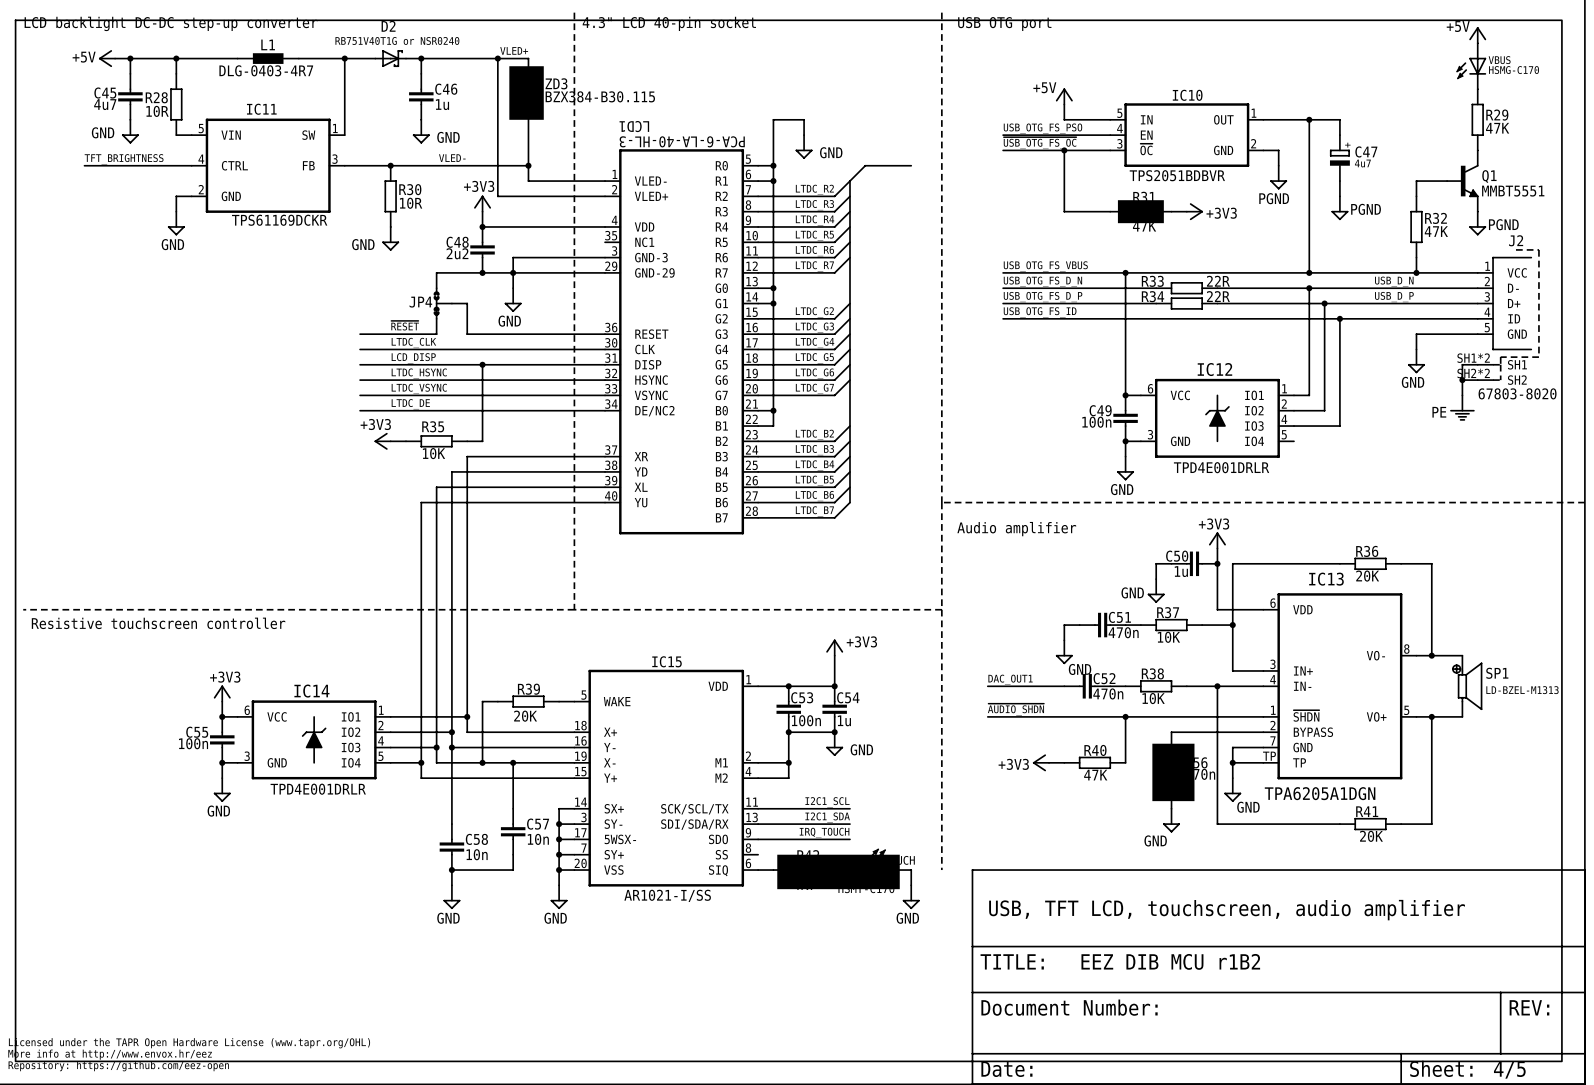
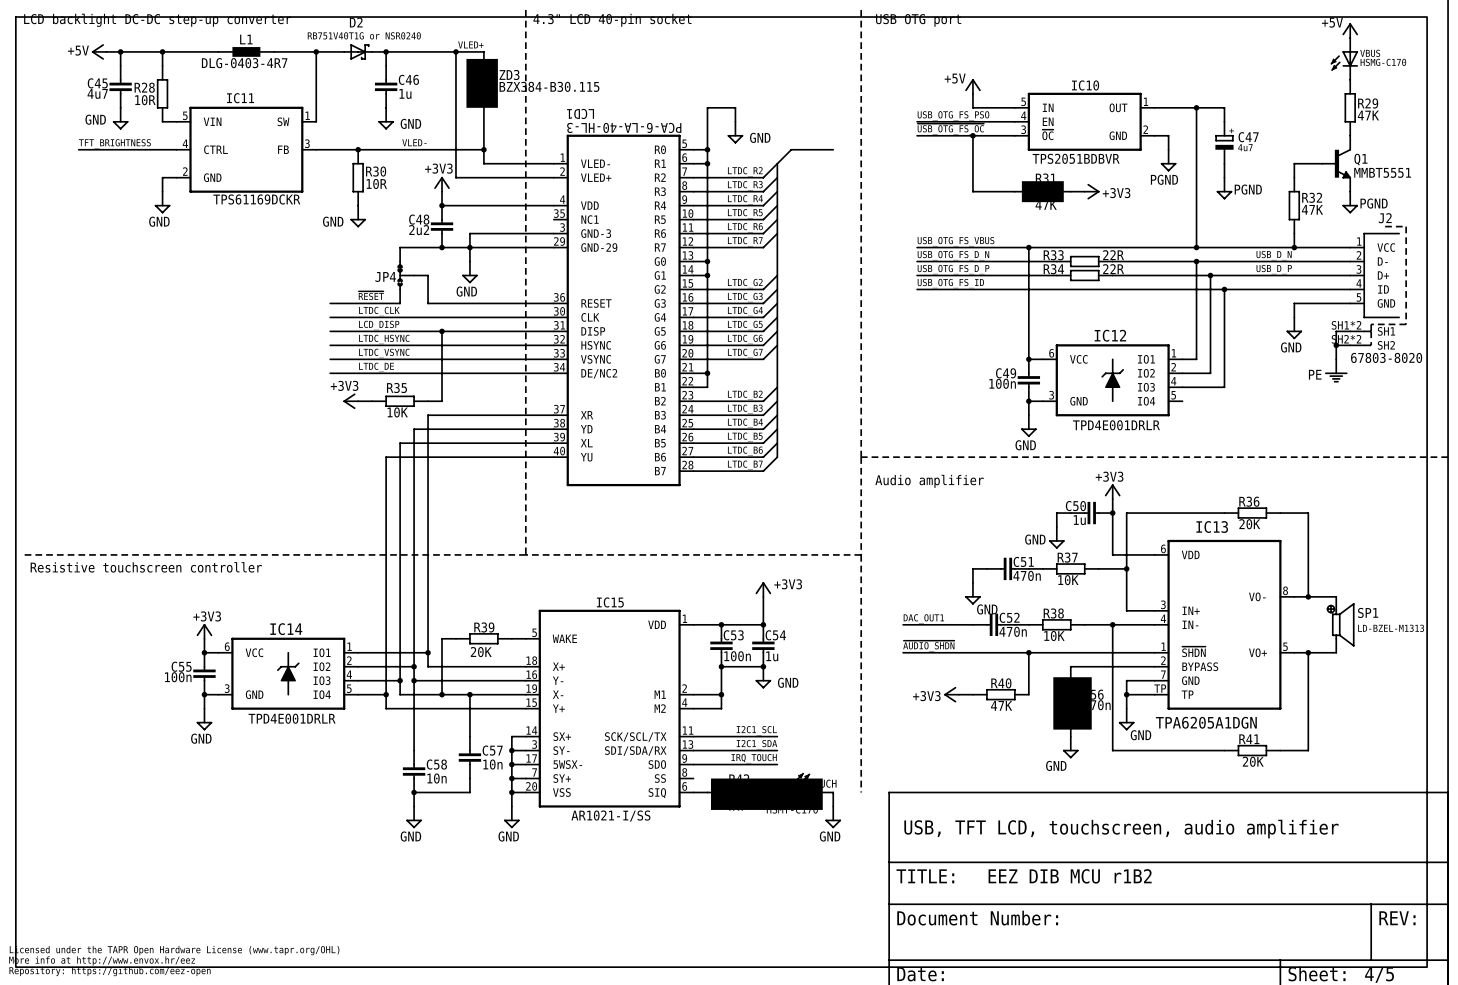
JP4 flip: as is (436, 303) -> up-down (400, 275)

